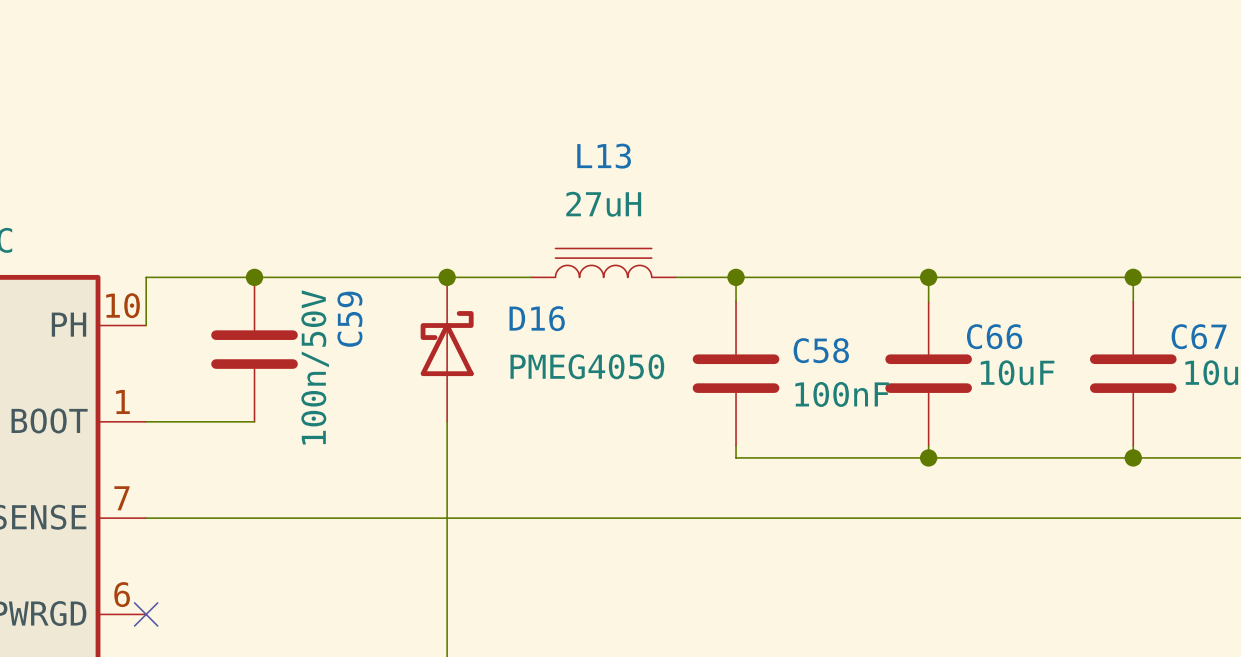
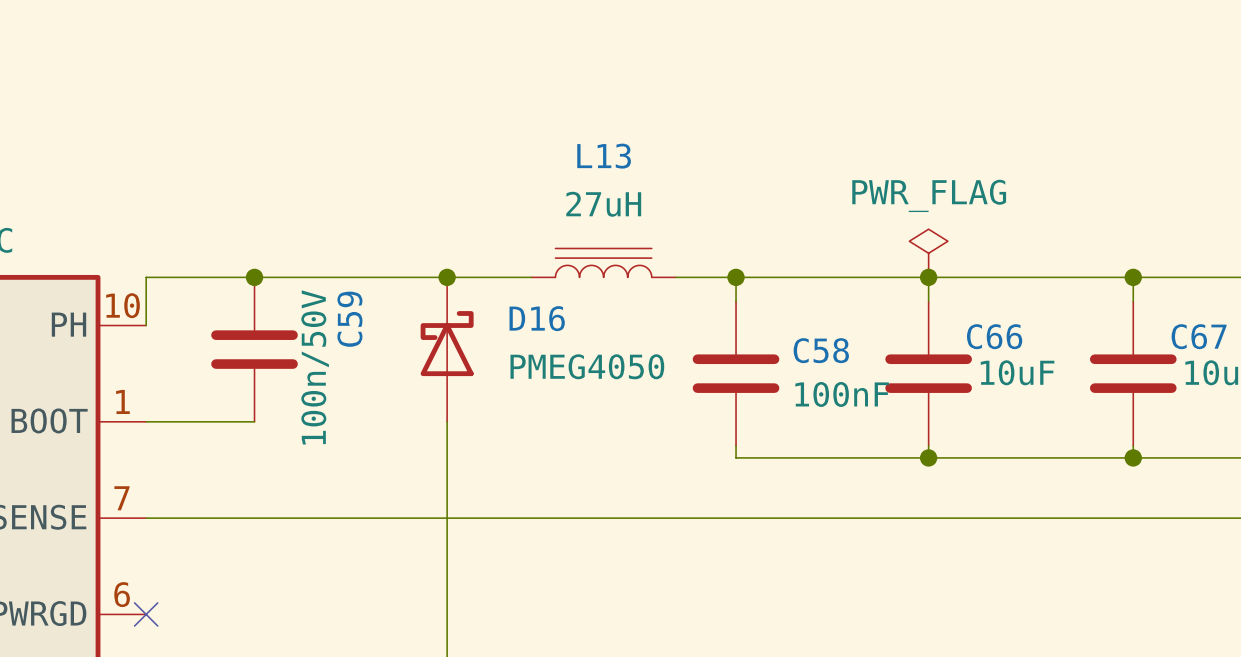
power symbol: none -> PWR_FLAG (928, 253)

